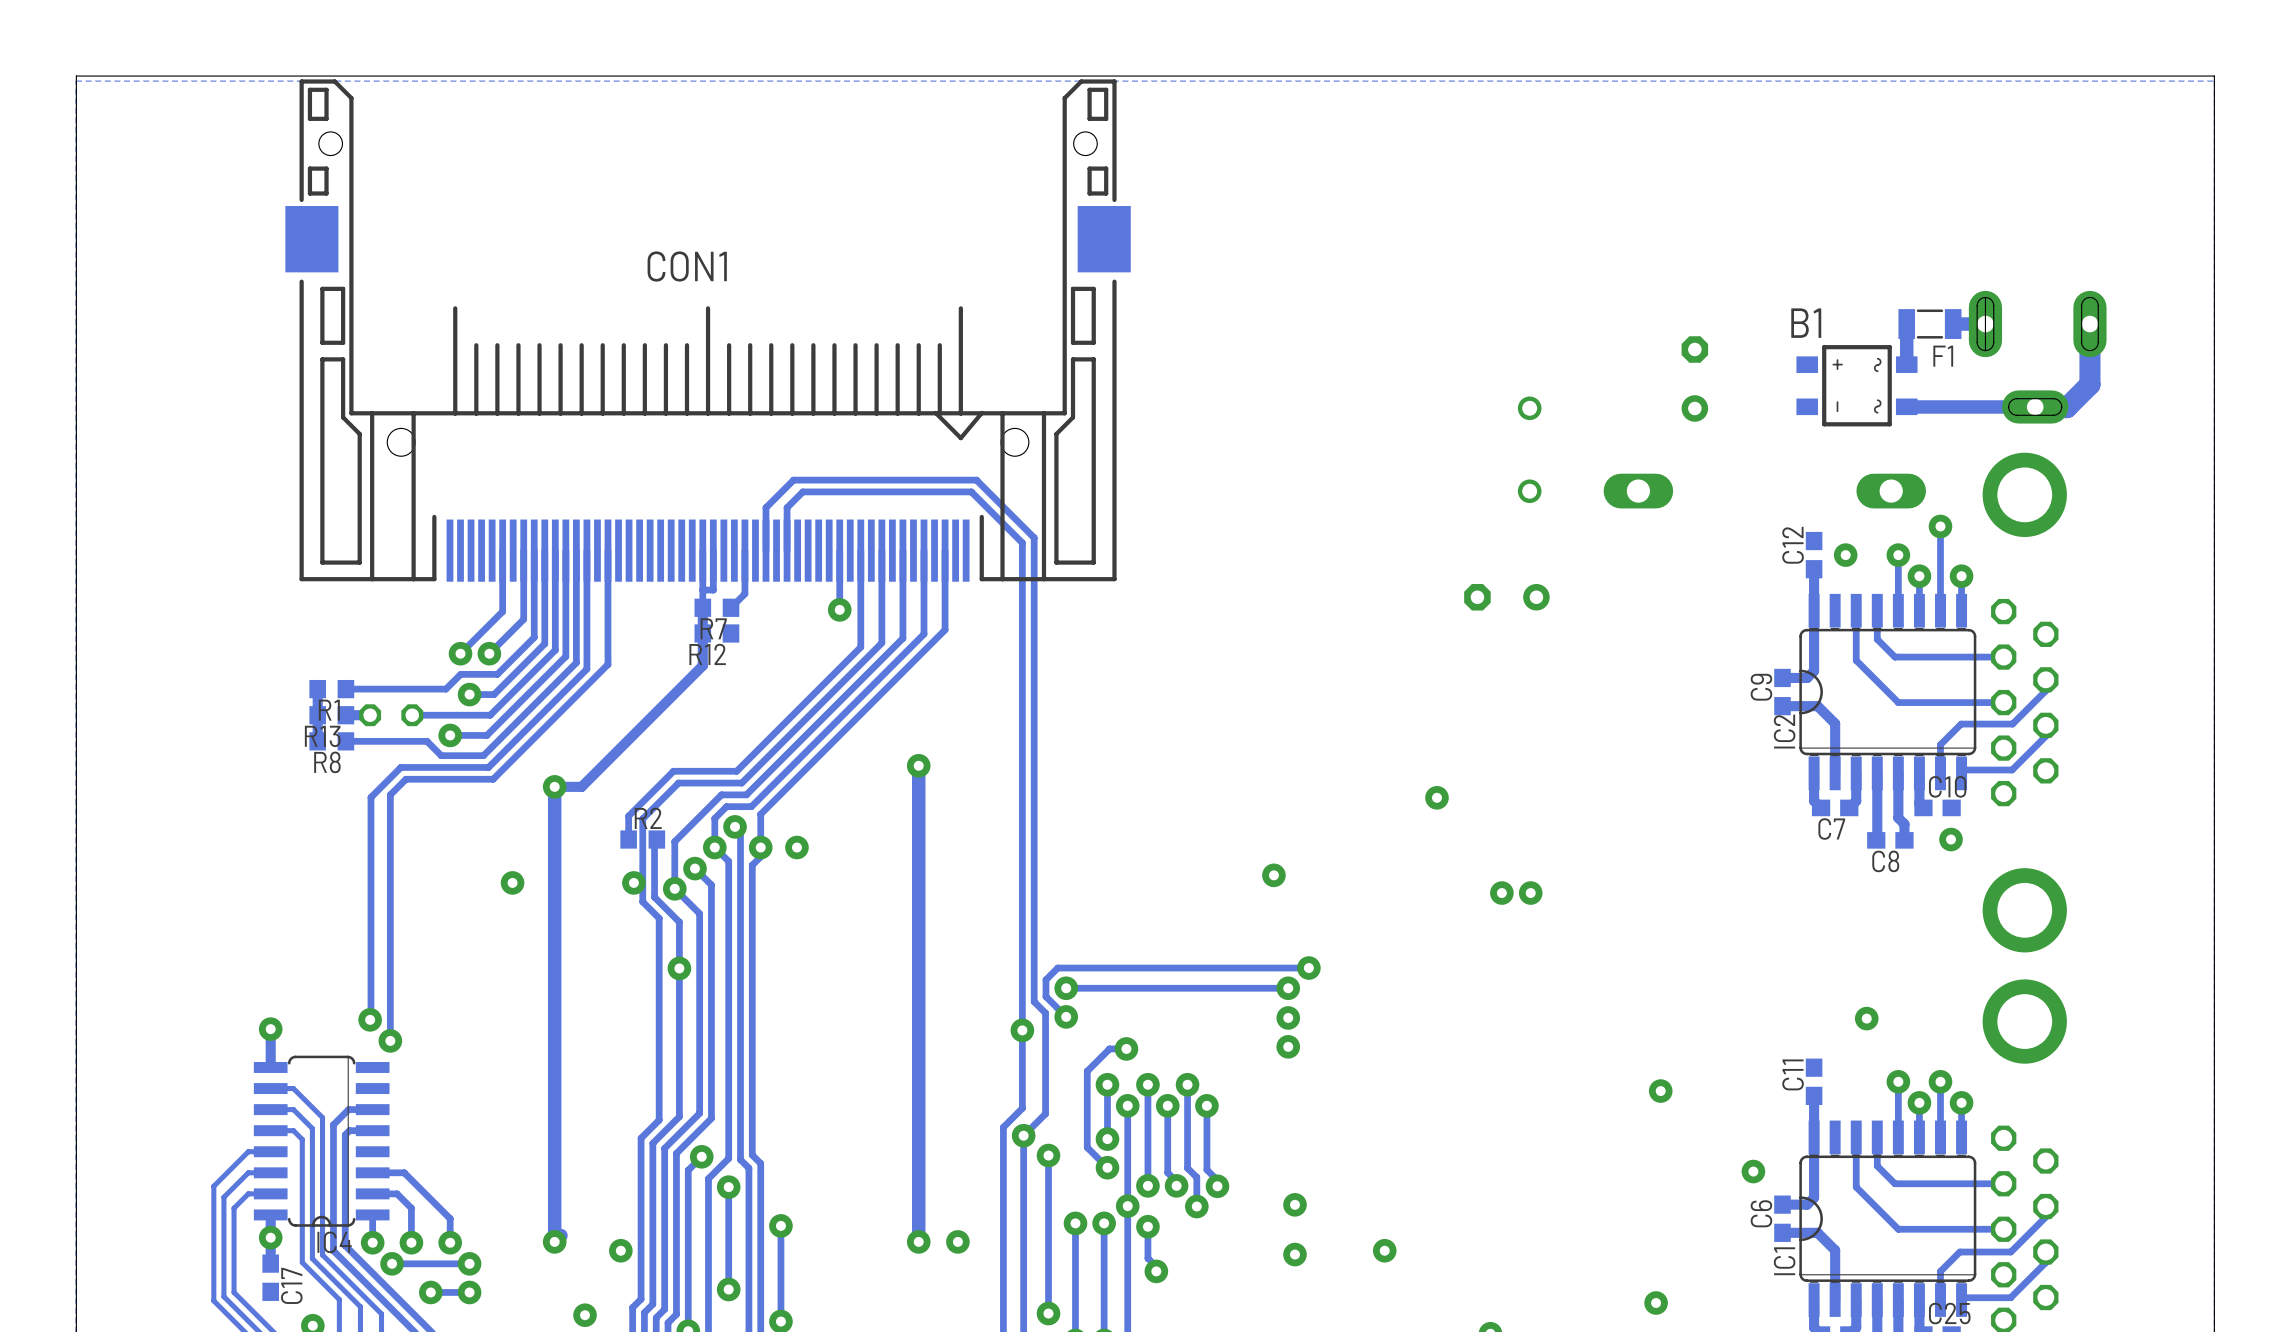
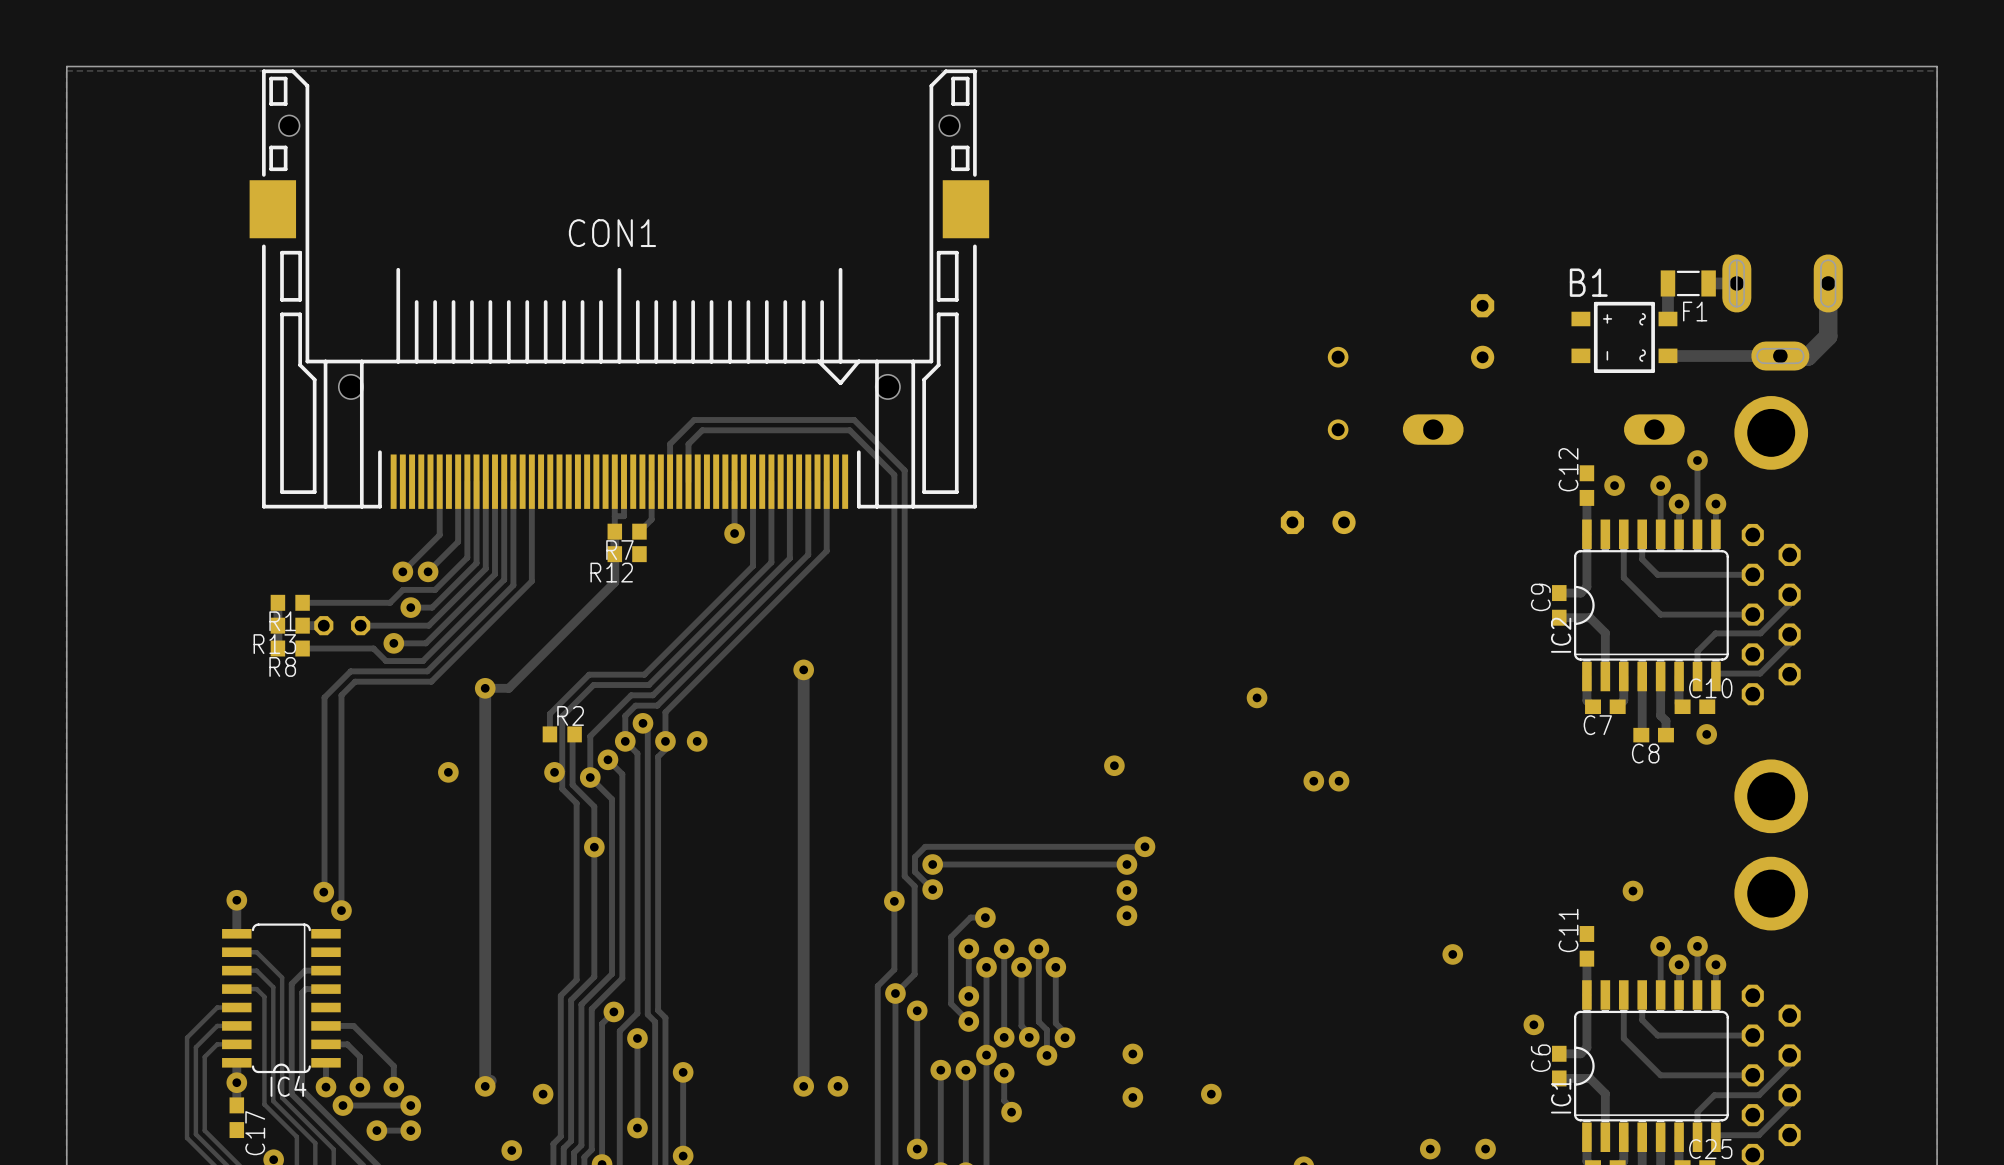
via: (1656, 1303) -> none
via: none -> (1430, 1149)
via: none -> (1485, 1149)

